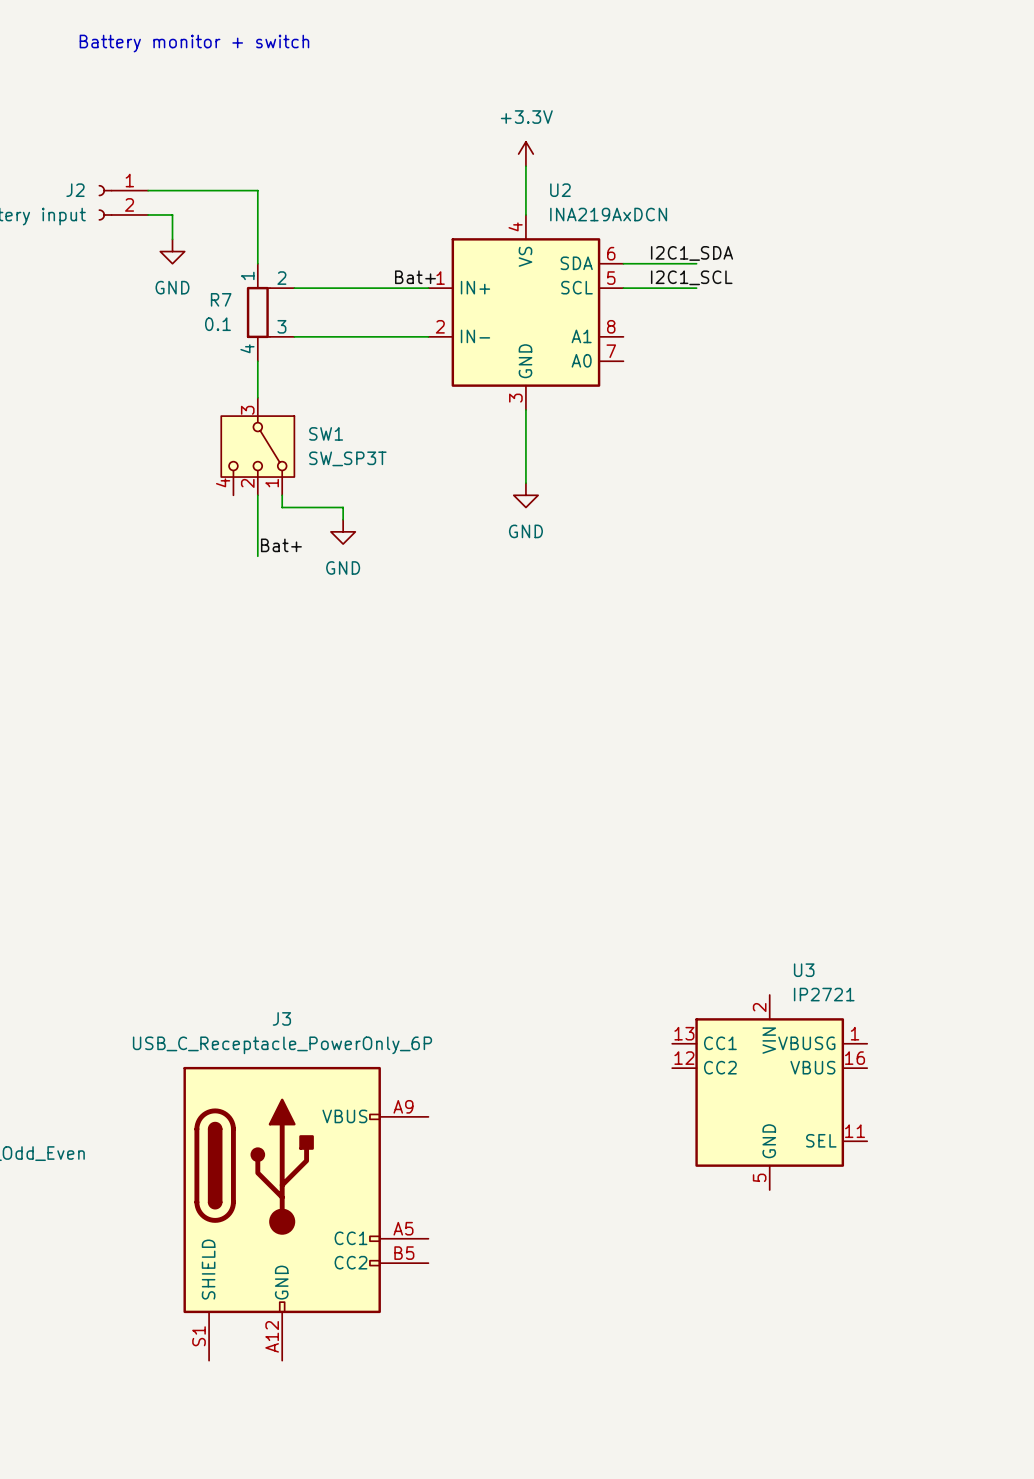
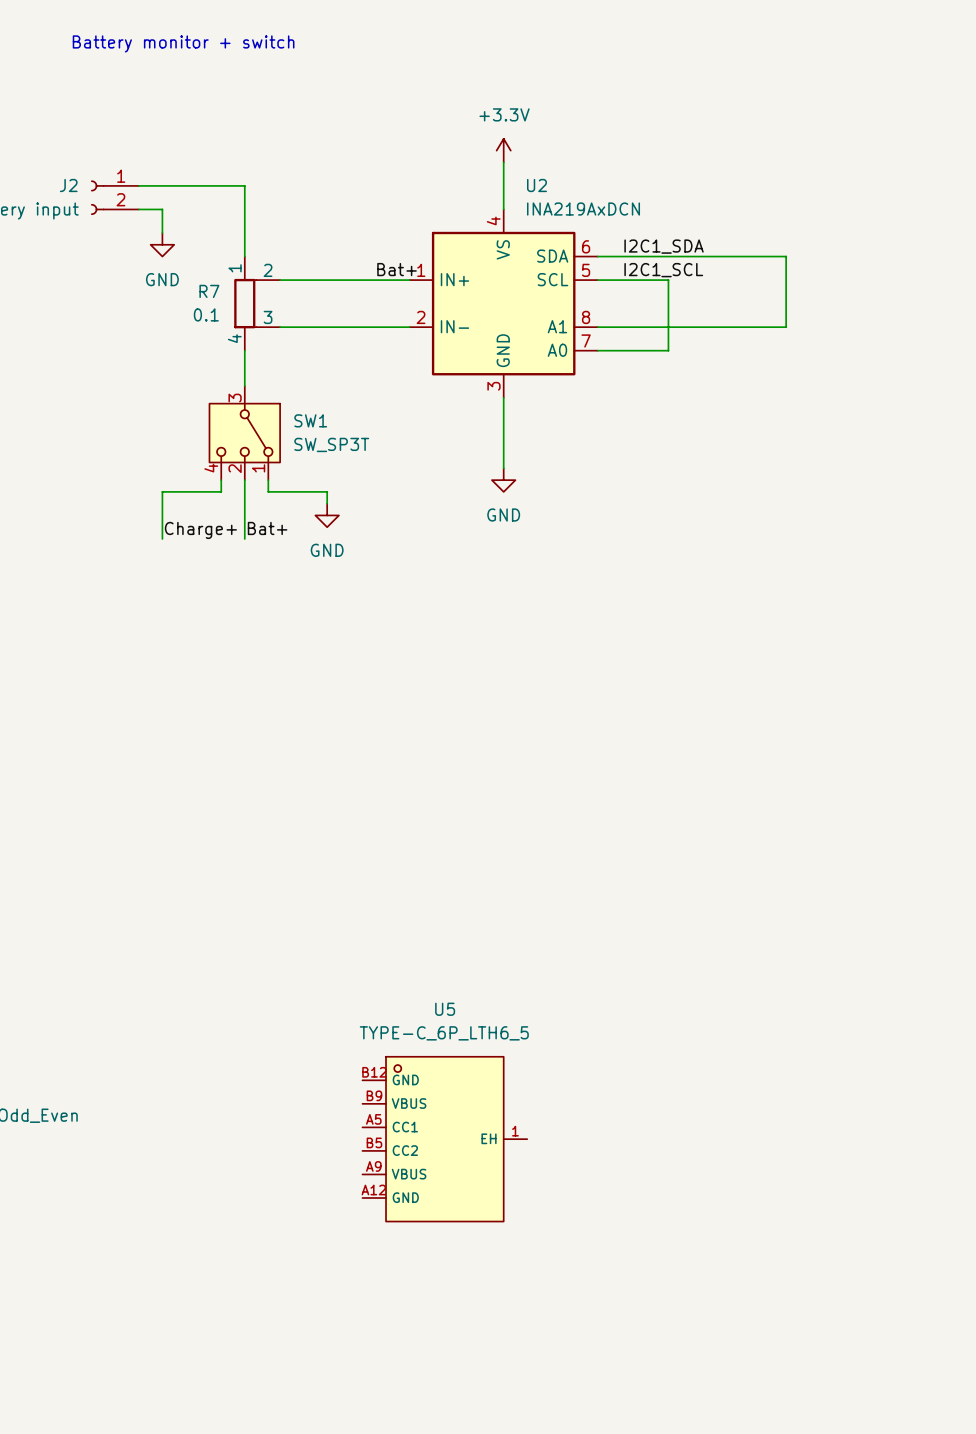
wire: none -> (668, 256) (786, 256) (786, 327) (597, 327)
wire: none -> (668, 280) (668, 350) (597, 350)
wire: none -> (221, 480) (221, 491) (162, 491) (162, 538)
label: none -> Charge+ (200, 530)
U3: IP2721 (769, 1092) -> none
U5: none -> TYPE-C_6P_LTH6_5 (444, 1139)
J3: USB_C_Receptacle_PowerOnly_6P (305, 1213) -> none

